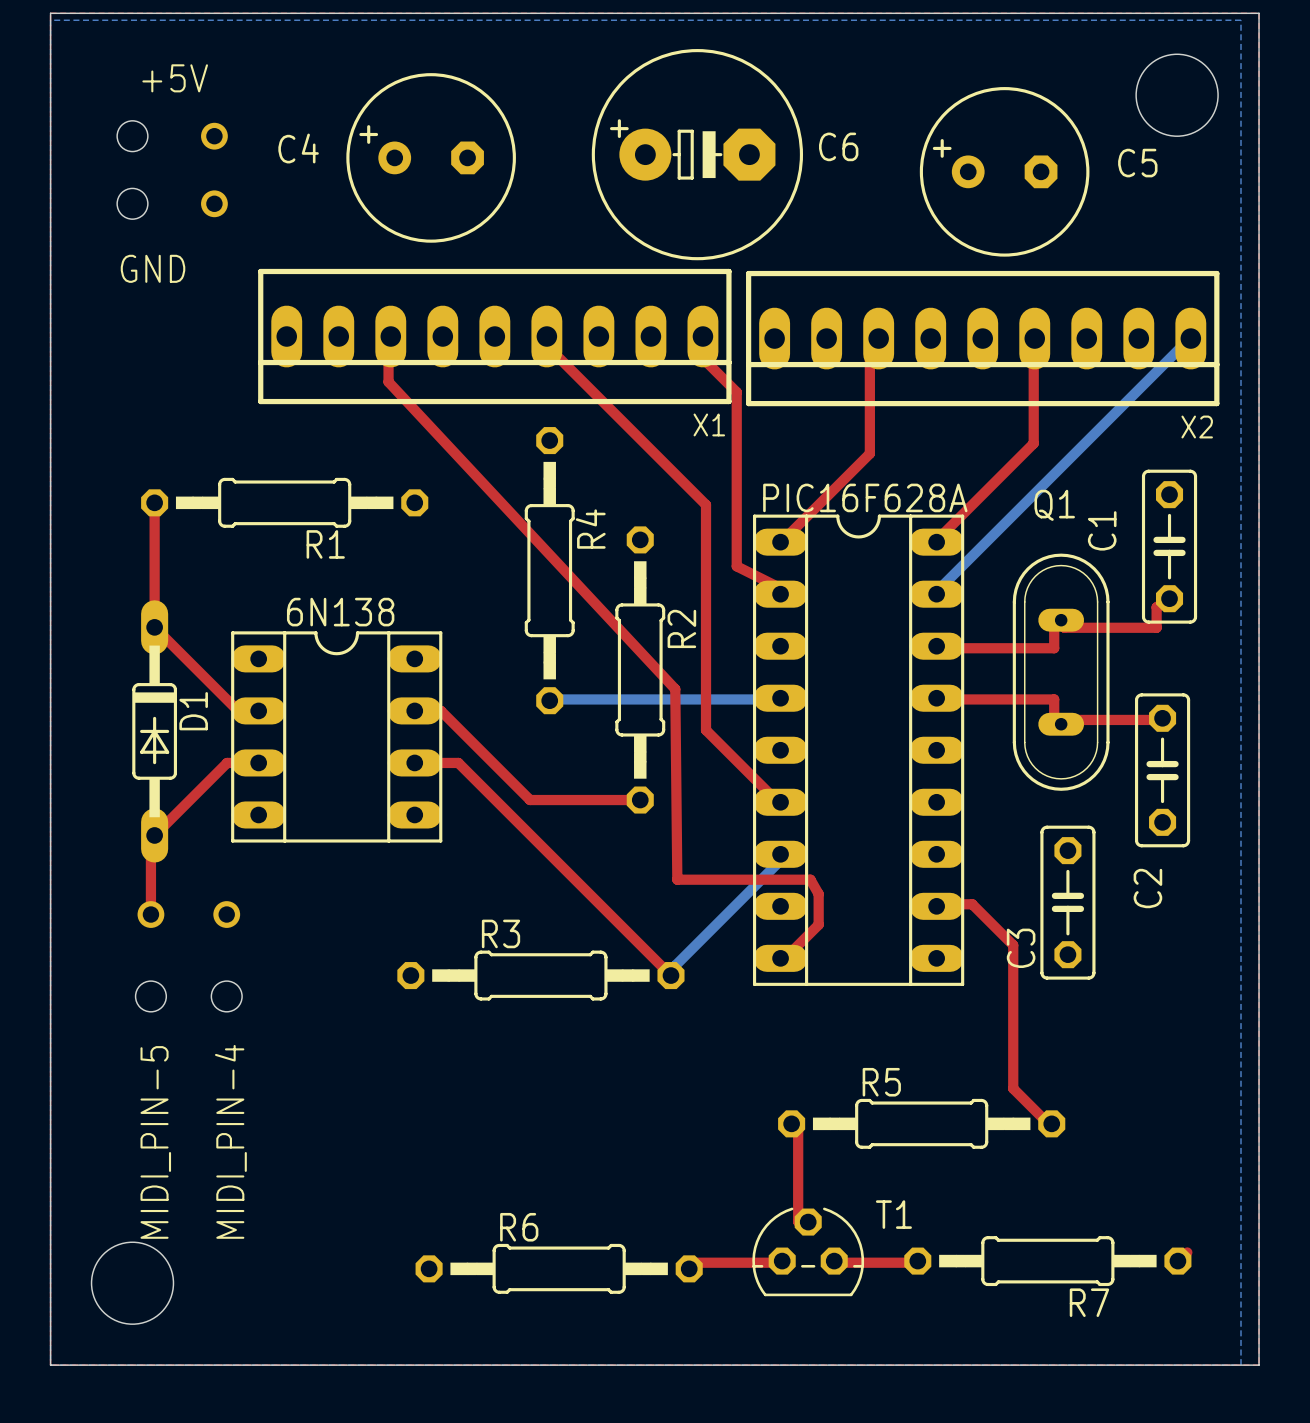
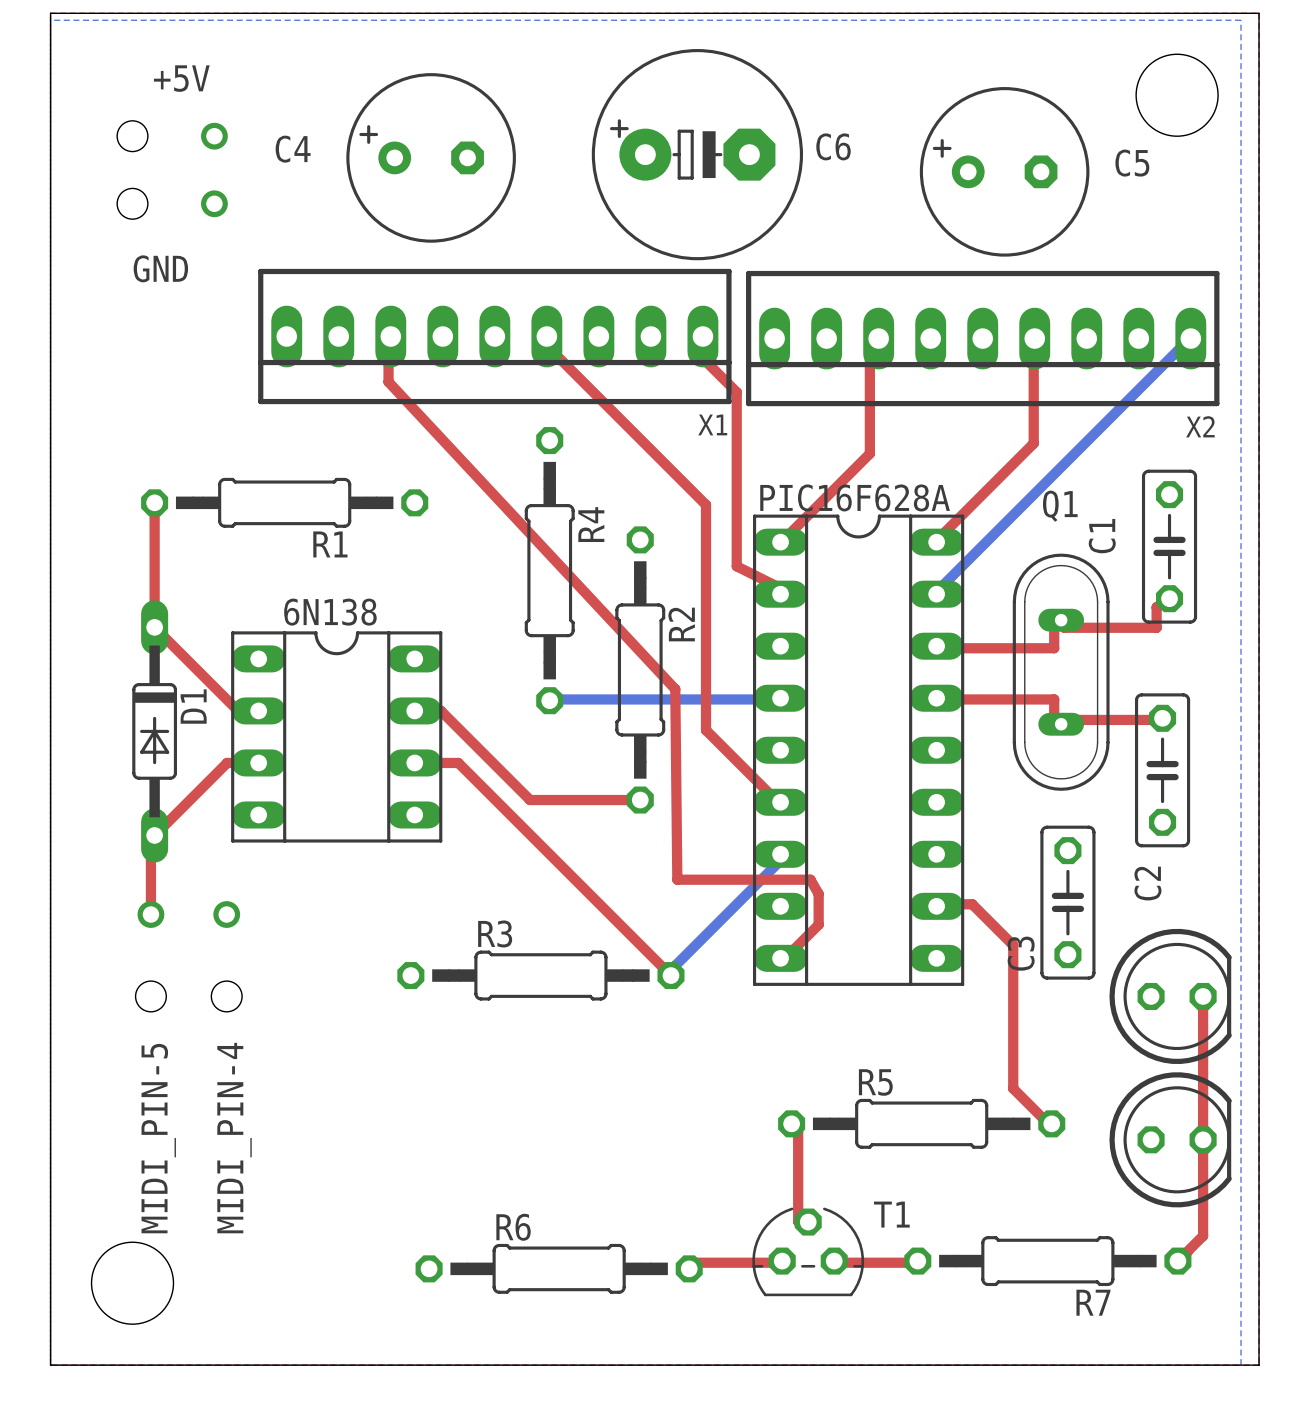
part: none -> (1170, 996)
top track: none -> (1203, 996) (1203, 1235) (1177, 1261)
part: none -> (1170, 1139)

